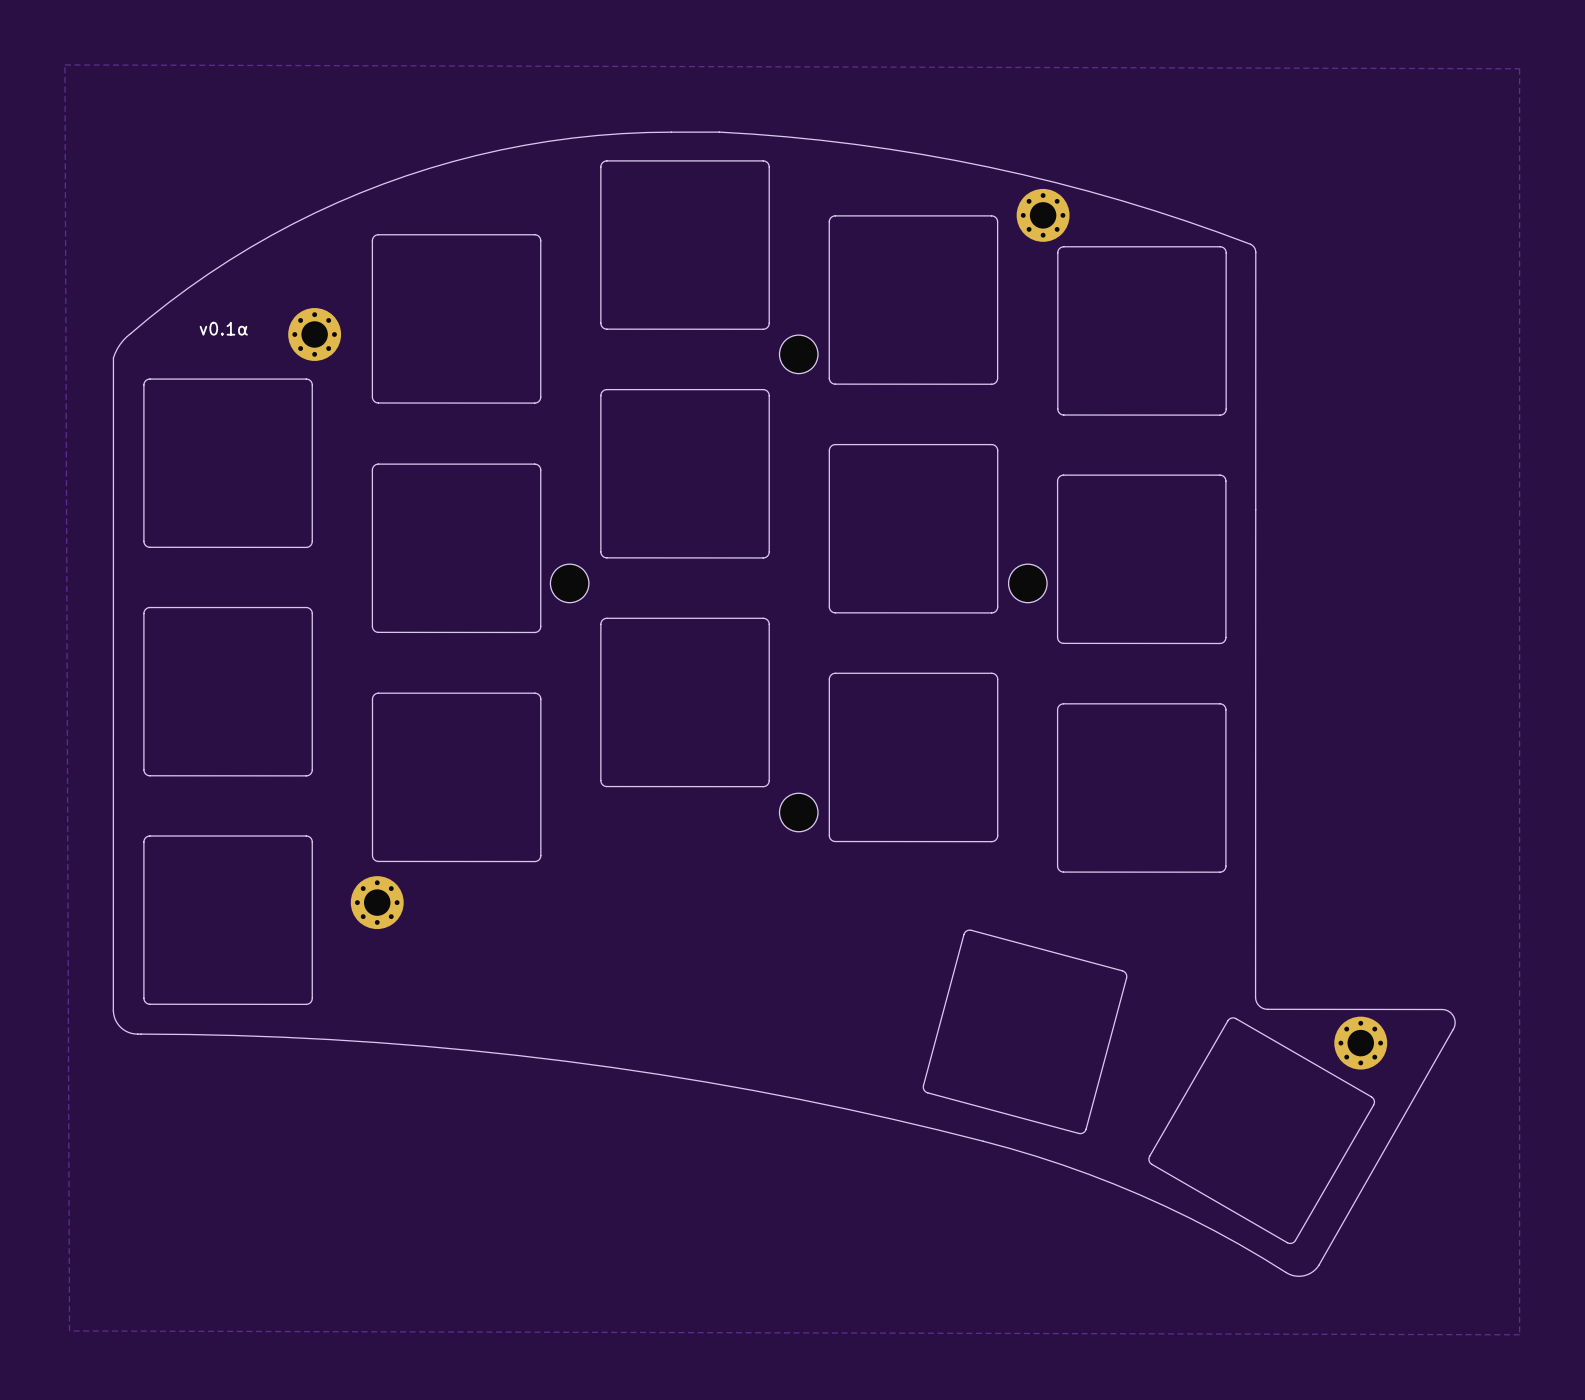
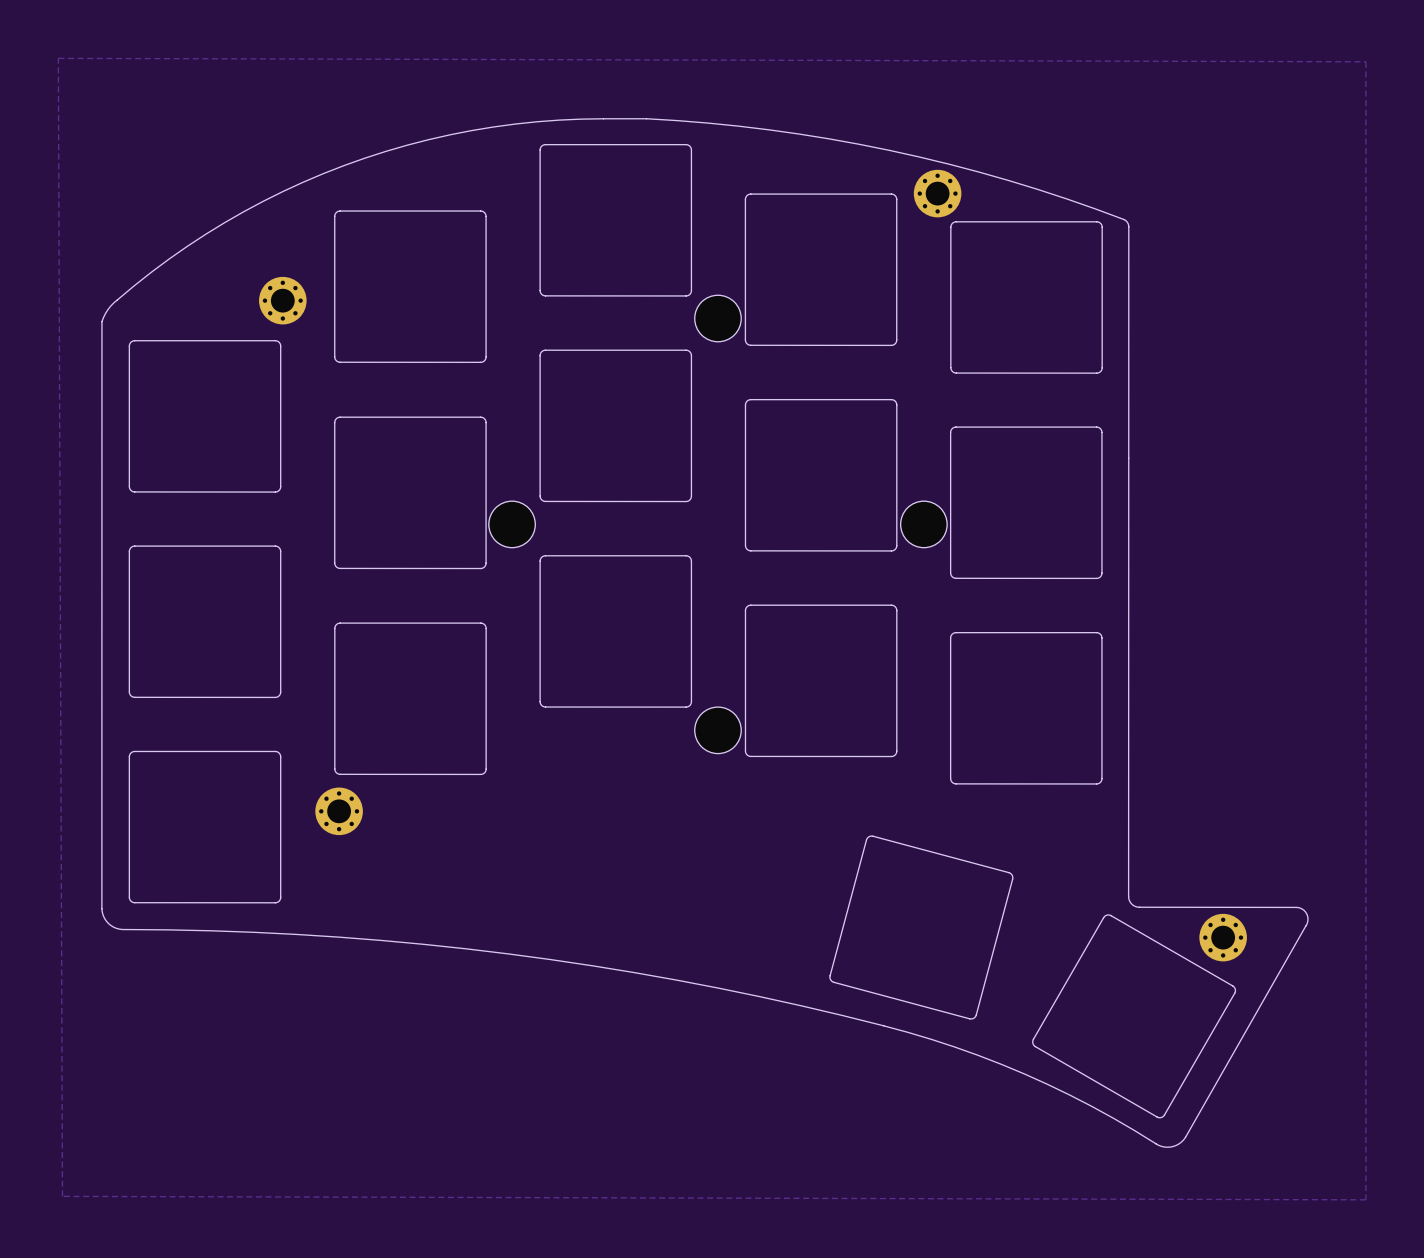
text: v0.1α (223, 328) -> none
part footprint: [779, 335, 818, 374] -> [694, 295, 742, 342]
part footprint: [550, 564, 589, 603] -> [488, 501, 536, 548]
part footprint: [1008, 564, 1048, 603] -> [900, 501, 948, 548]
part footprint: [779, 793, 818, 832] -> [694, 707, 742, 754]

